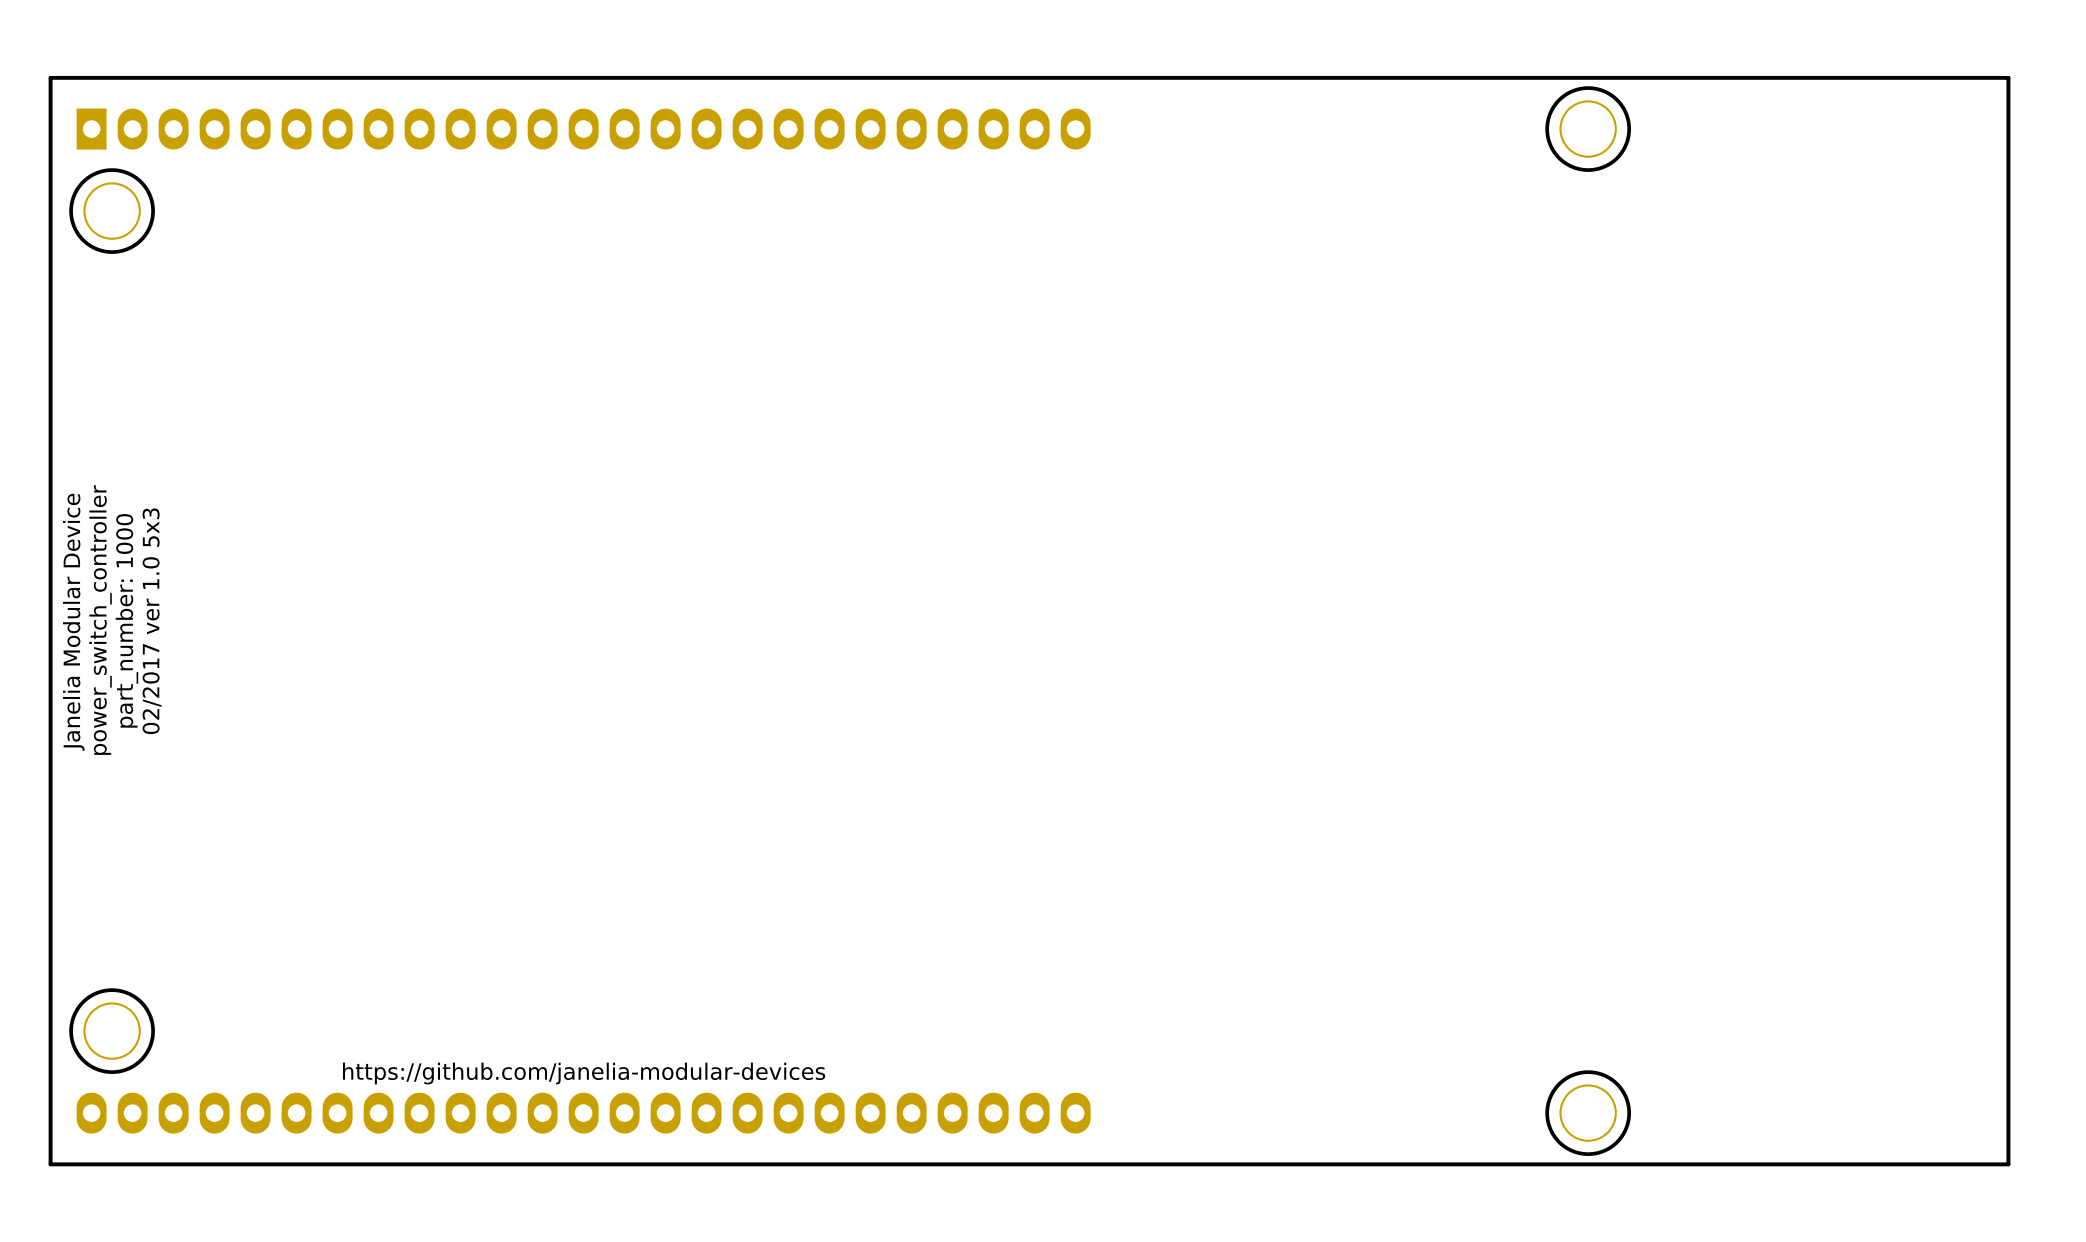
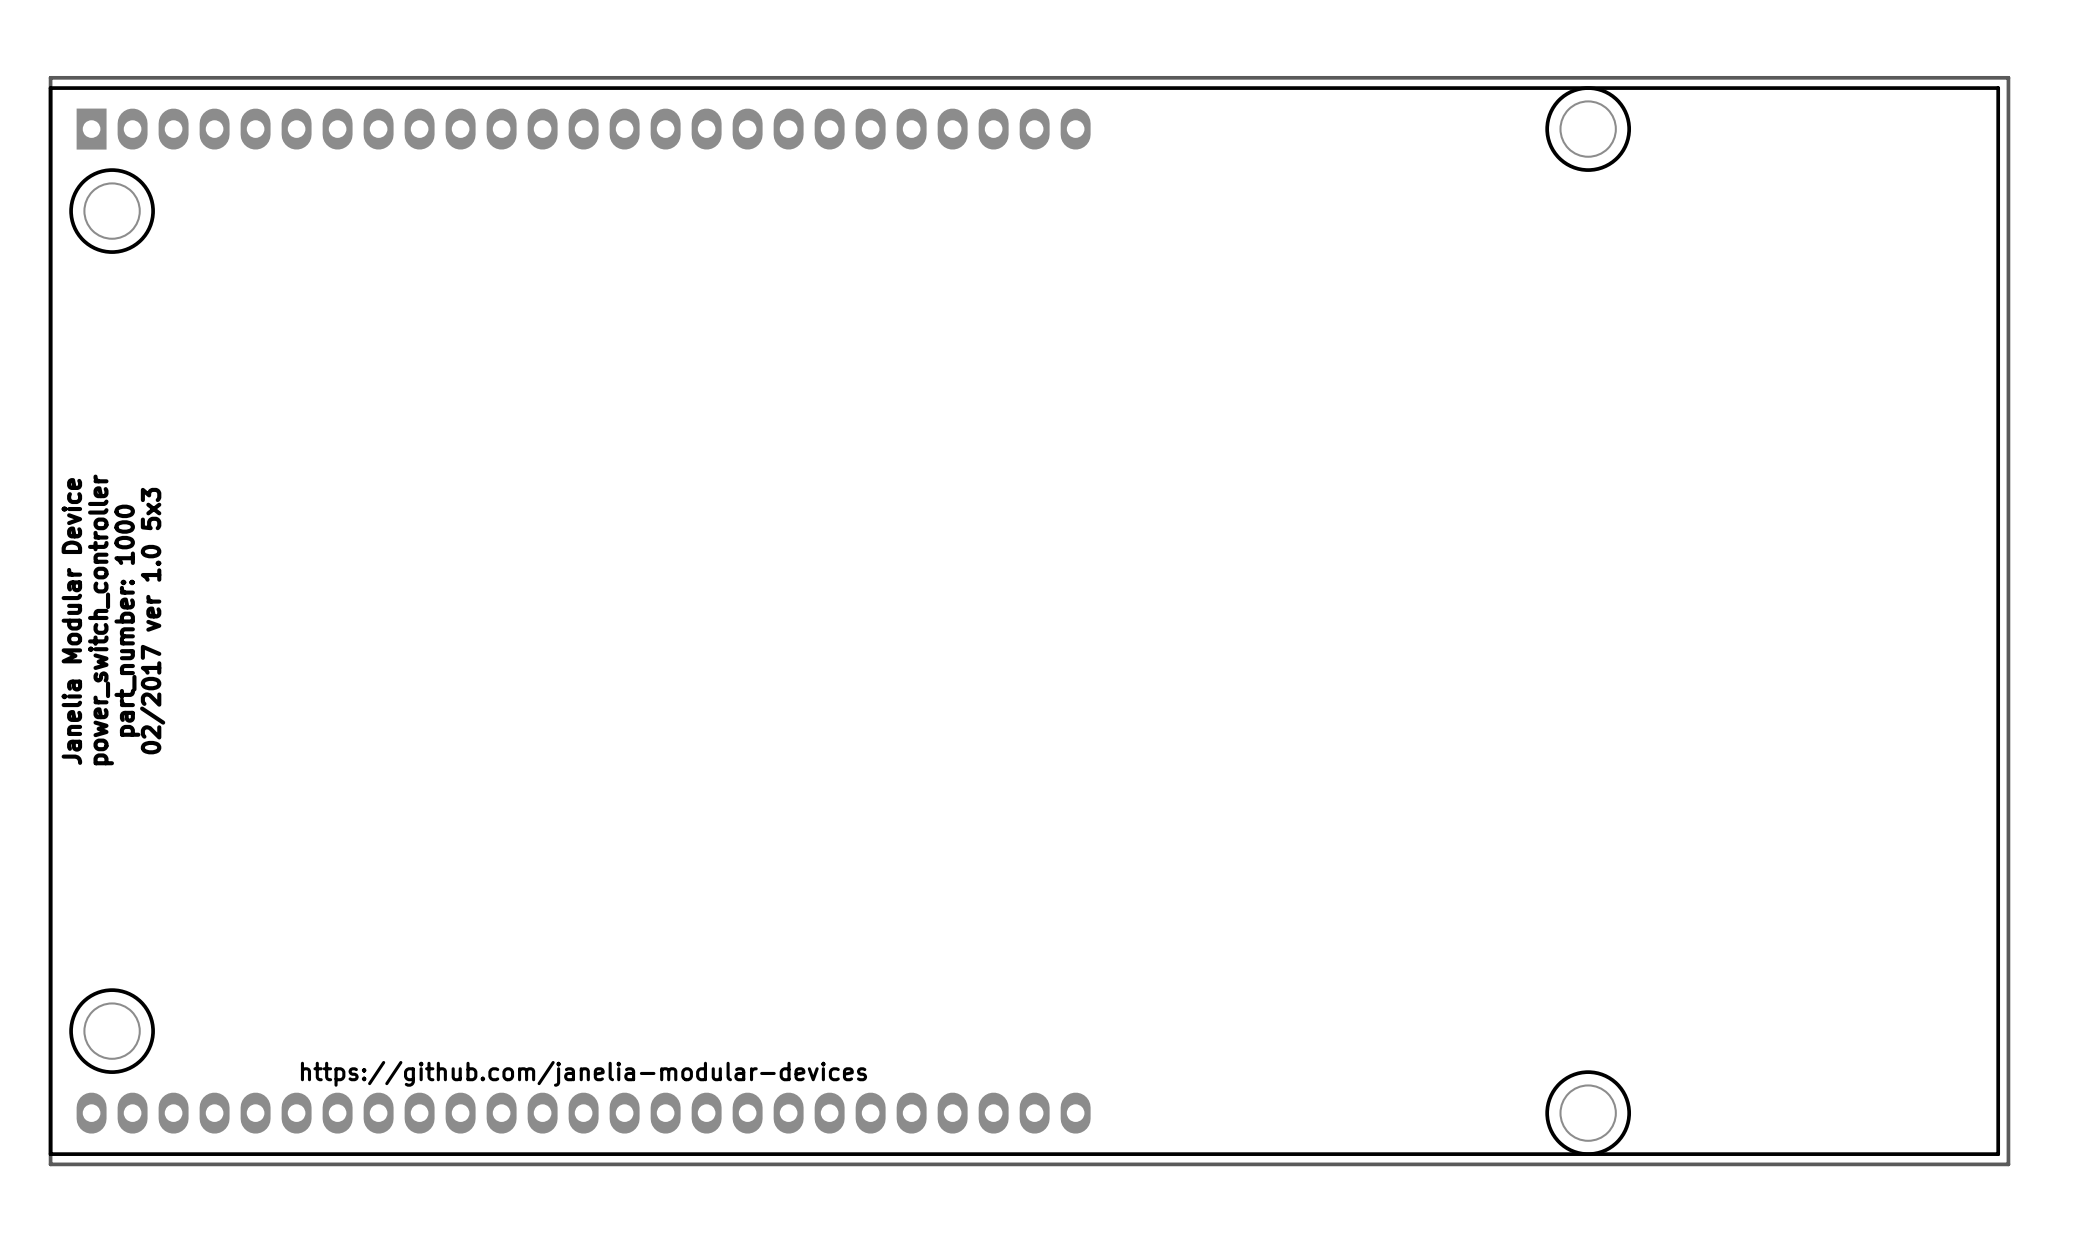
board edge: (50, 88) (50, 77) (2008, 77) (2008, 1164) (50, 1164) (50, 1154) -> (50, 88) (1998, 88) (1998, 1154) (50, 1154)

